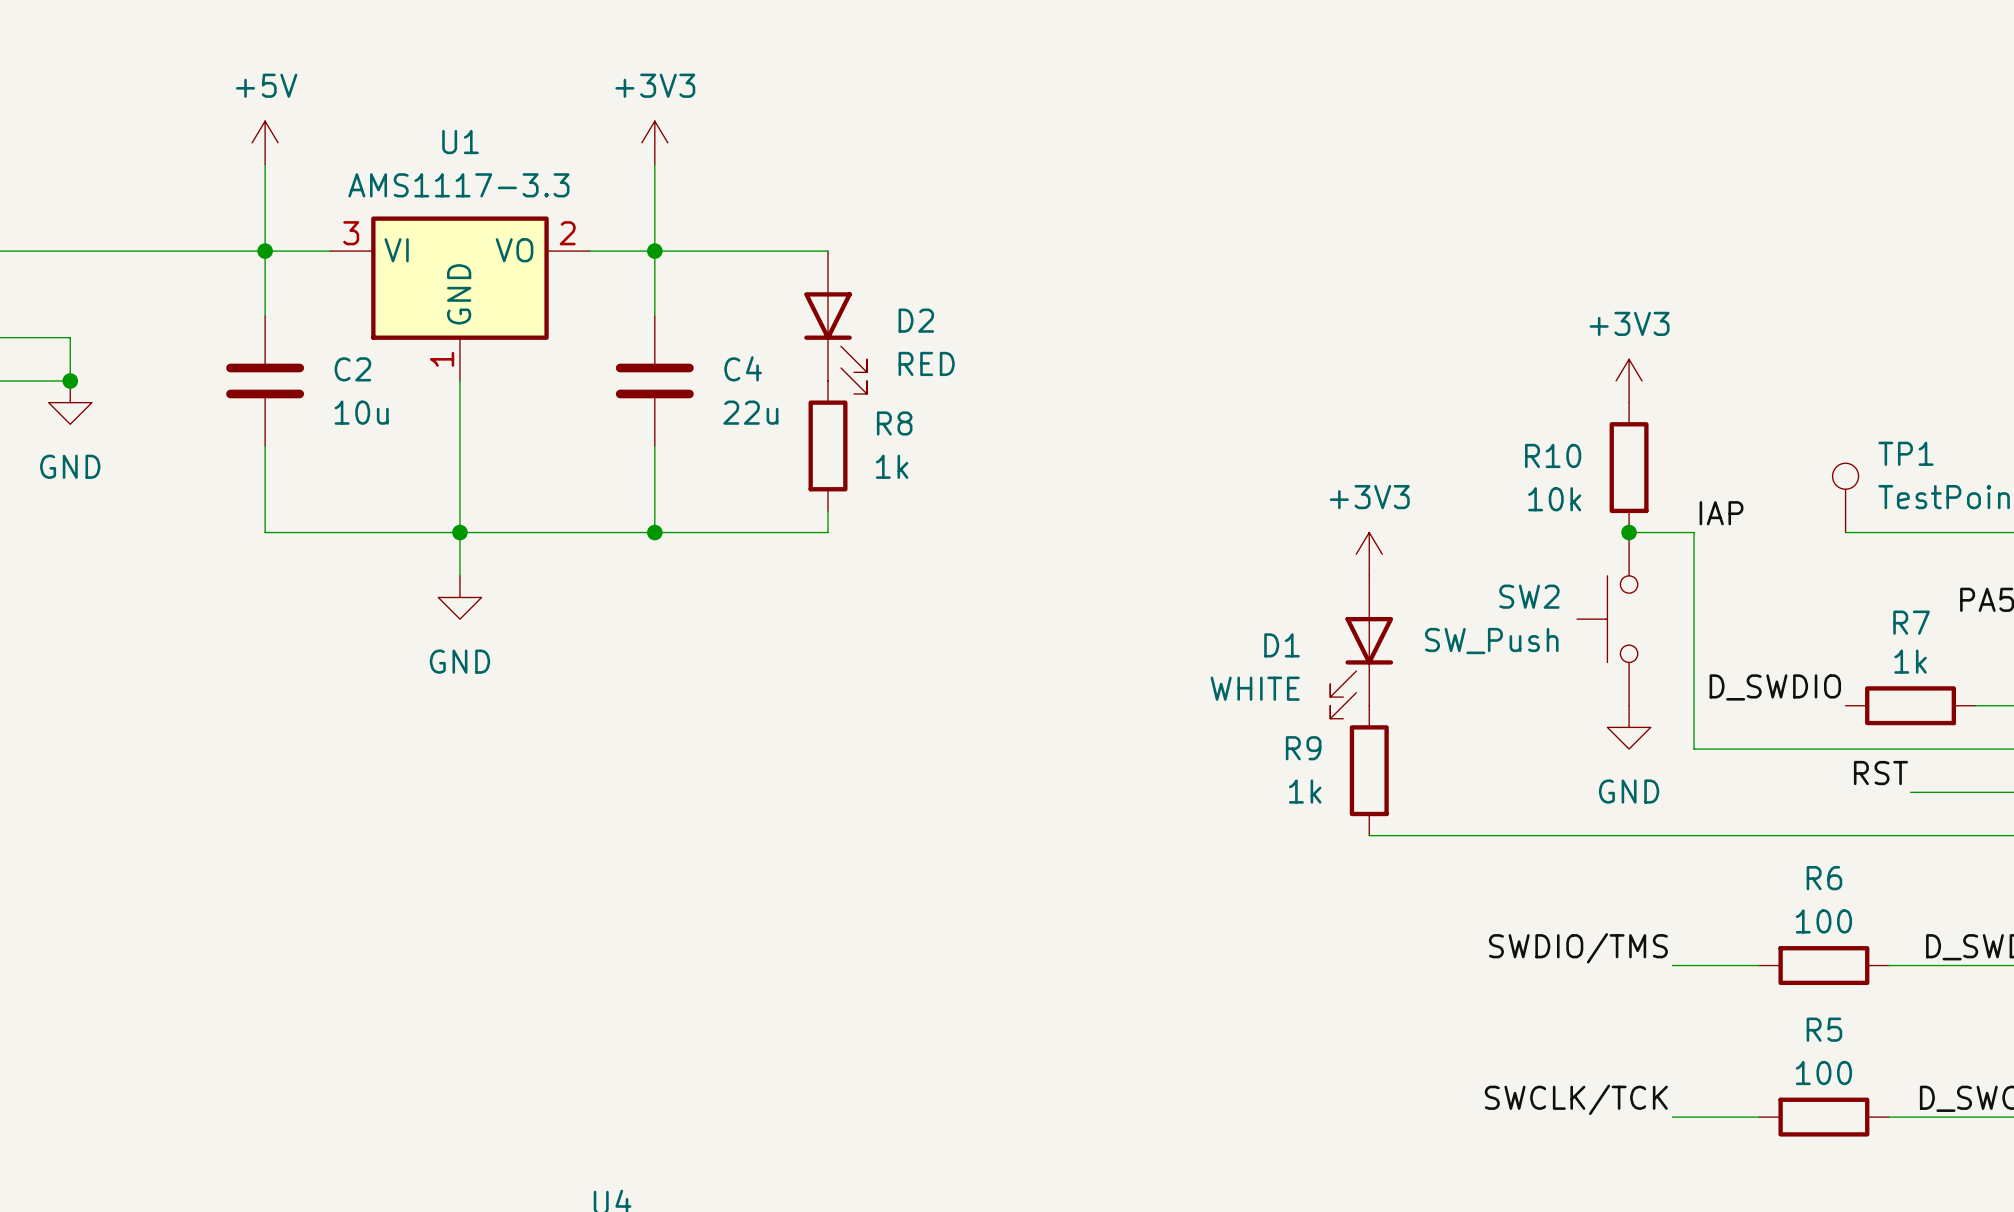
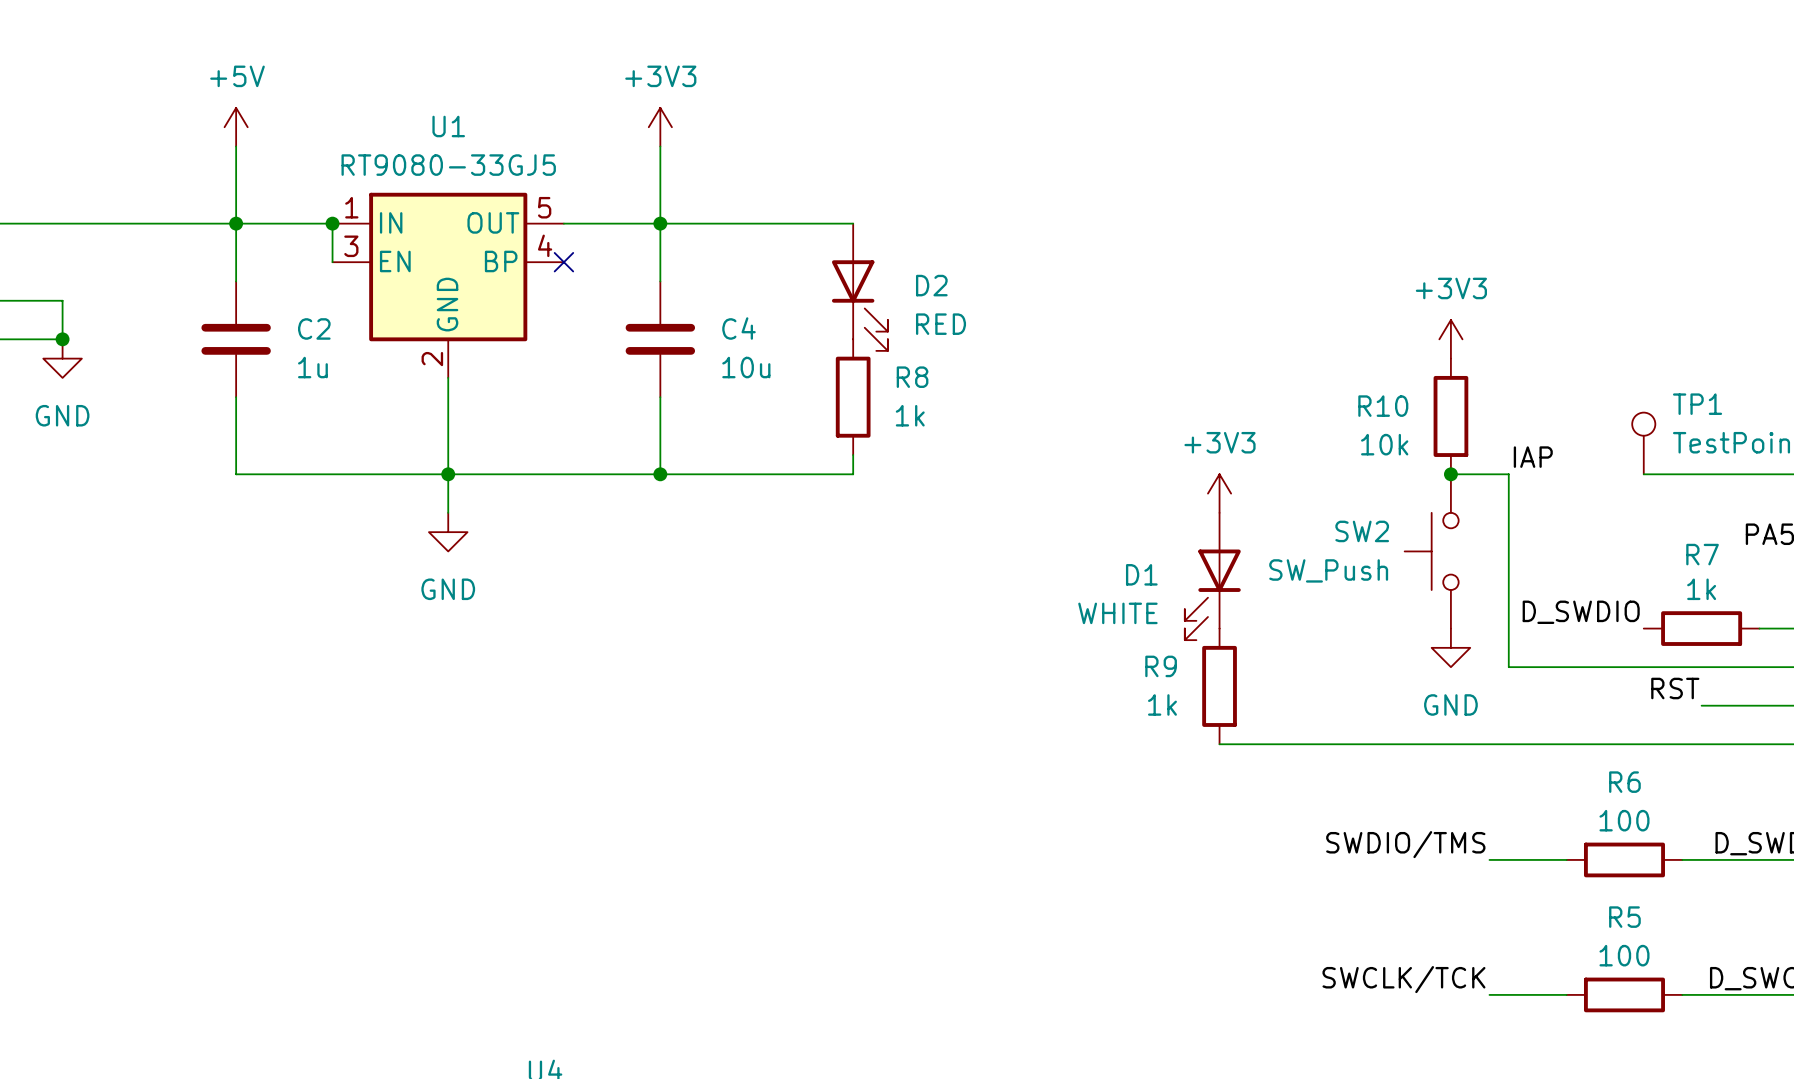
power symbol position: +3V3 (654, 142) -> +3V3 (660, 127)
wire: (654, 164) (654, 316) -> (660, 146) (660, 281)
U1 value: AMS1117-3.3 (458, 185) -> RT9080-33GJ5 (448, 165)
U1 symbol: [330, 216, 590, 381] -> [332, 192, 564, 378]
junction: none -> (332, 223)
junction position: (654, 251) -> (660, 223)
wire: none -> (737, 223) (853, 223)
no-connect mark: none -> (563, 262)
D2 position: (835, 322) -> (859, 287)
wire: (459, 380) (459, 575) -> none
C4 position: (654, 380) -> (660, 339)
C2 value: 10u (361, 412) -> 1u (312, 367)
C4 value: 22u (750, 412) -> 10u (746, 367)
wire: none -> (448, 377) (448, 512)
wire: (654, 445) (654, 532) -> (660, 397) (660, 474)
R8 position: (828, 445) -> (853, 397)
wire: (828, 510) (828, 532) -> (853, 455) (853, 474) (737, 474)
junction position: (459, 532) -> (448, 474)
junction: (654, 532) -> none
junction: none -> (660, 474)
power symbol position: GND (459, 597) -> GND (448, 532)

